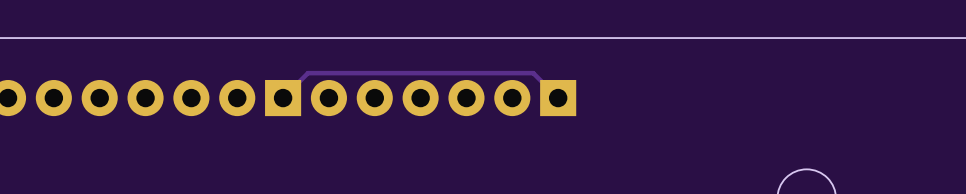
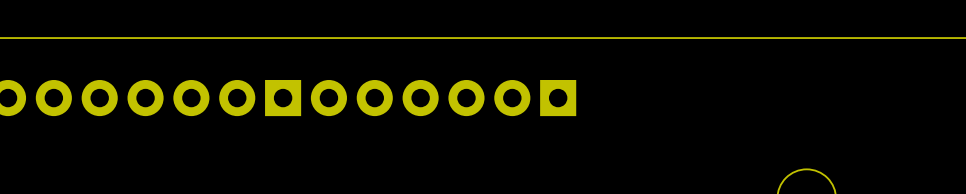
track: (283, 98) (307, 73) (533, 73) (558, 98) -> none

